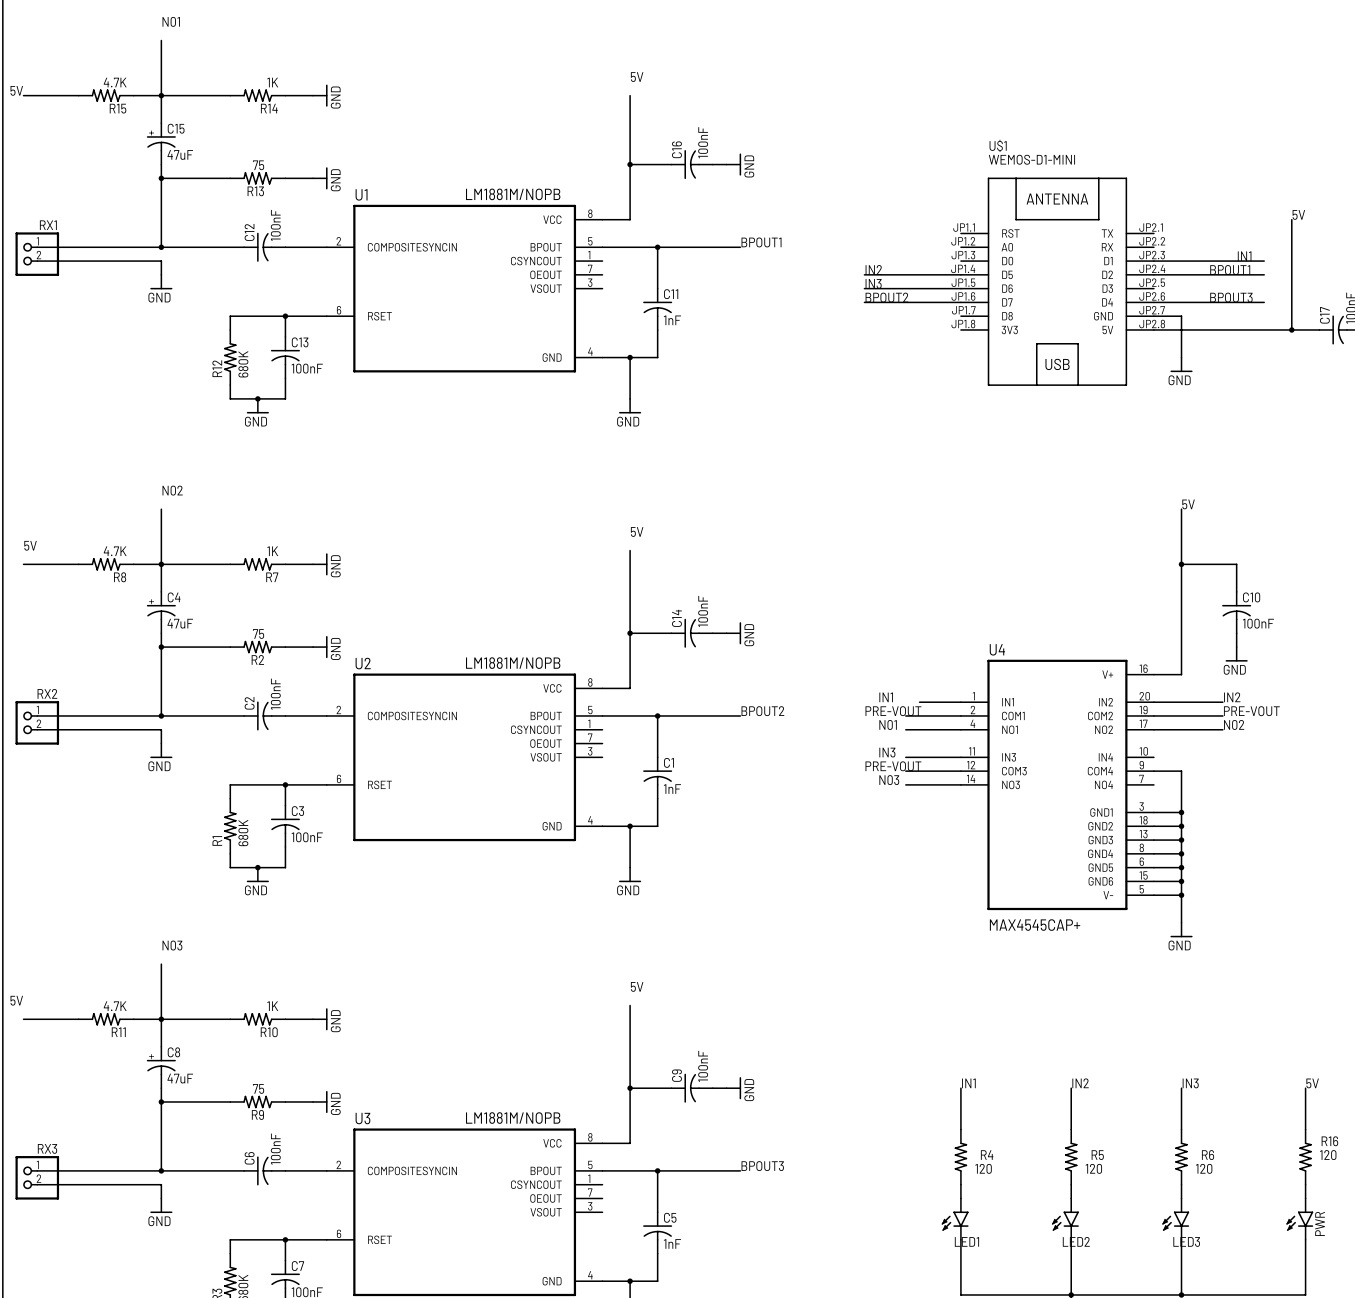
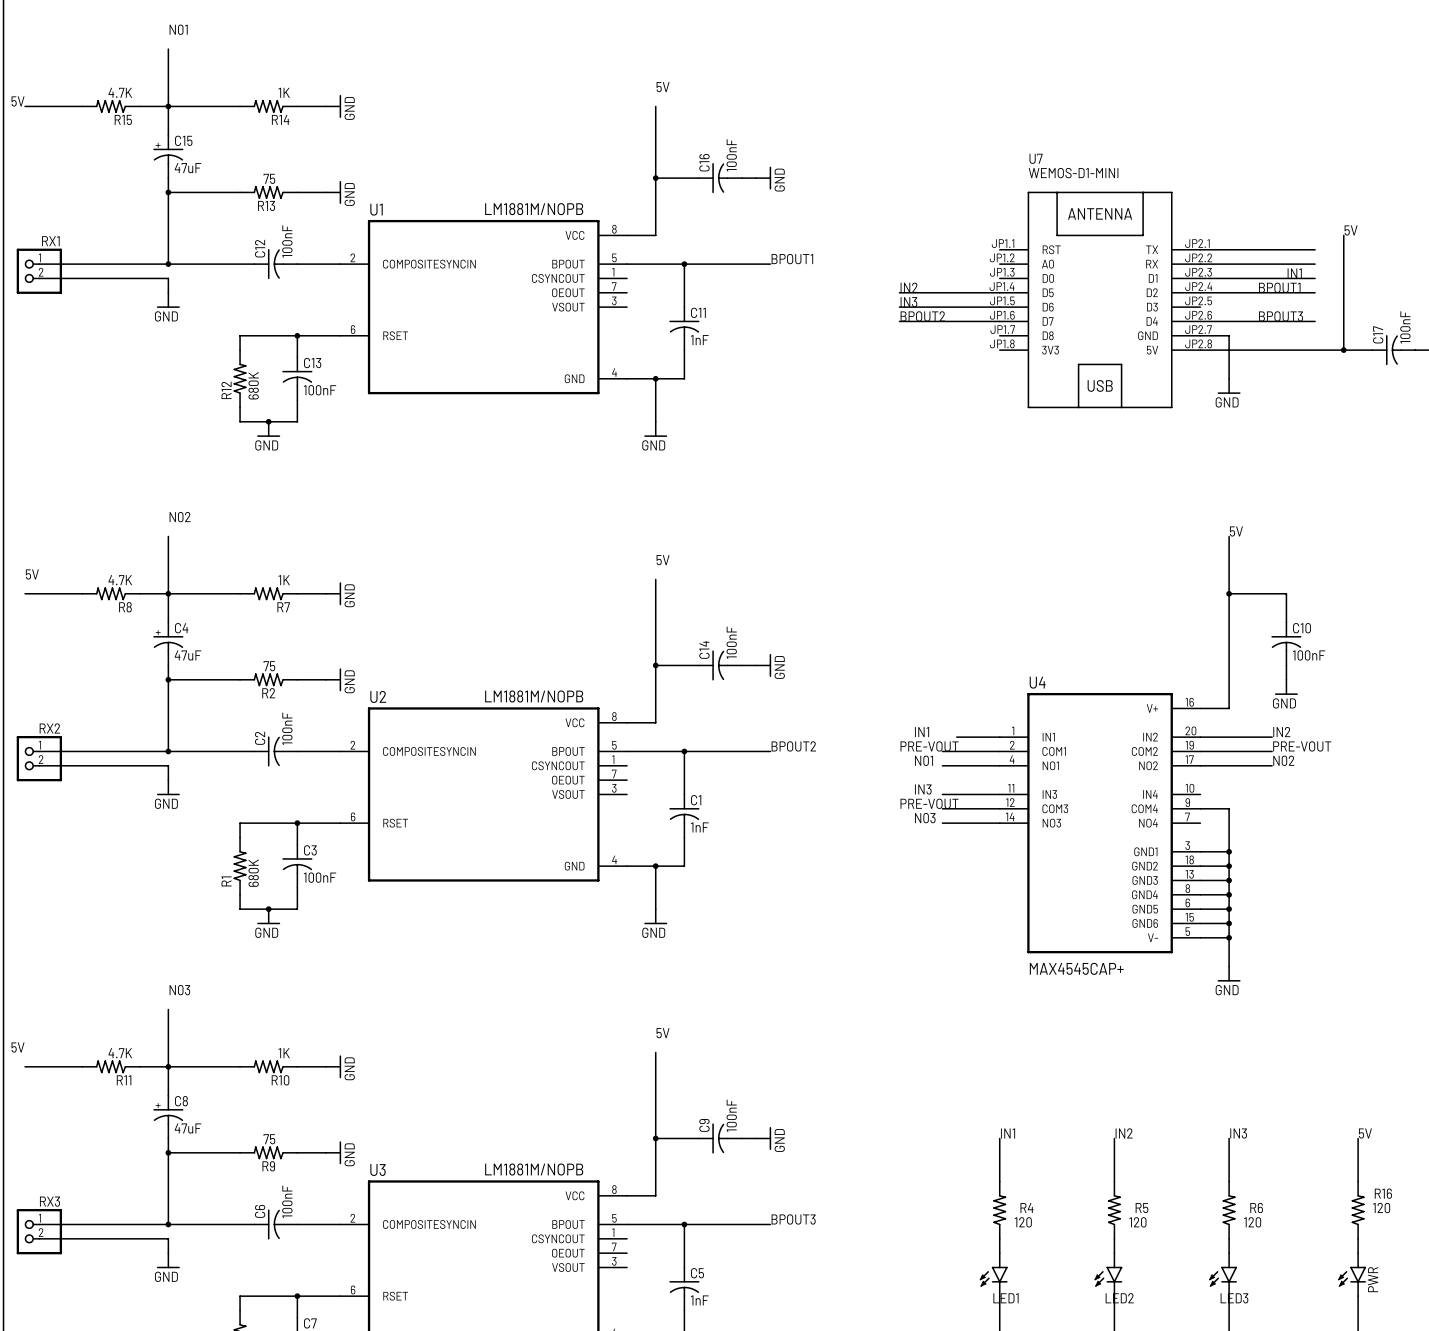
U$1 name: U$1 (998, 145) -> U7 (1036, 158)
wire: none -> (1200, 249) (1315, 249)
wire: none -> (1200, 264) (1315, 264)

